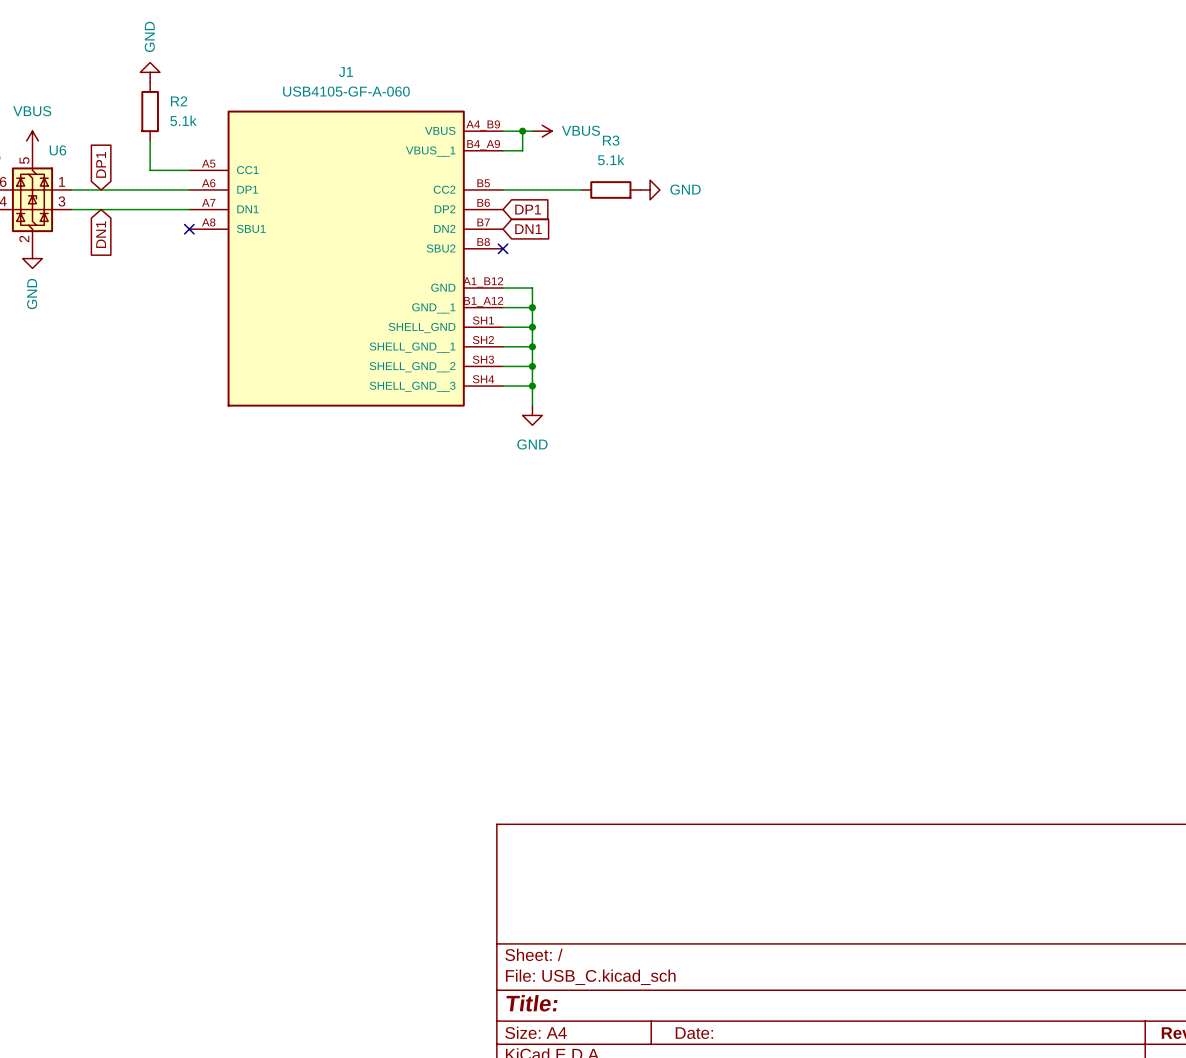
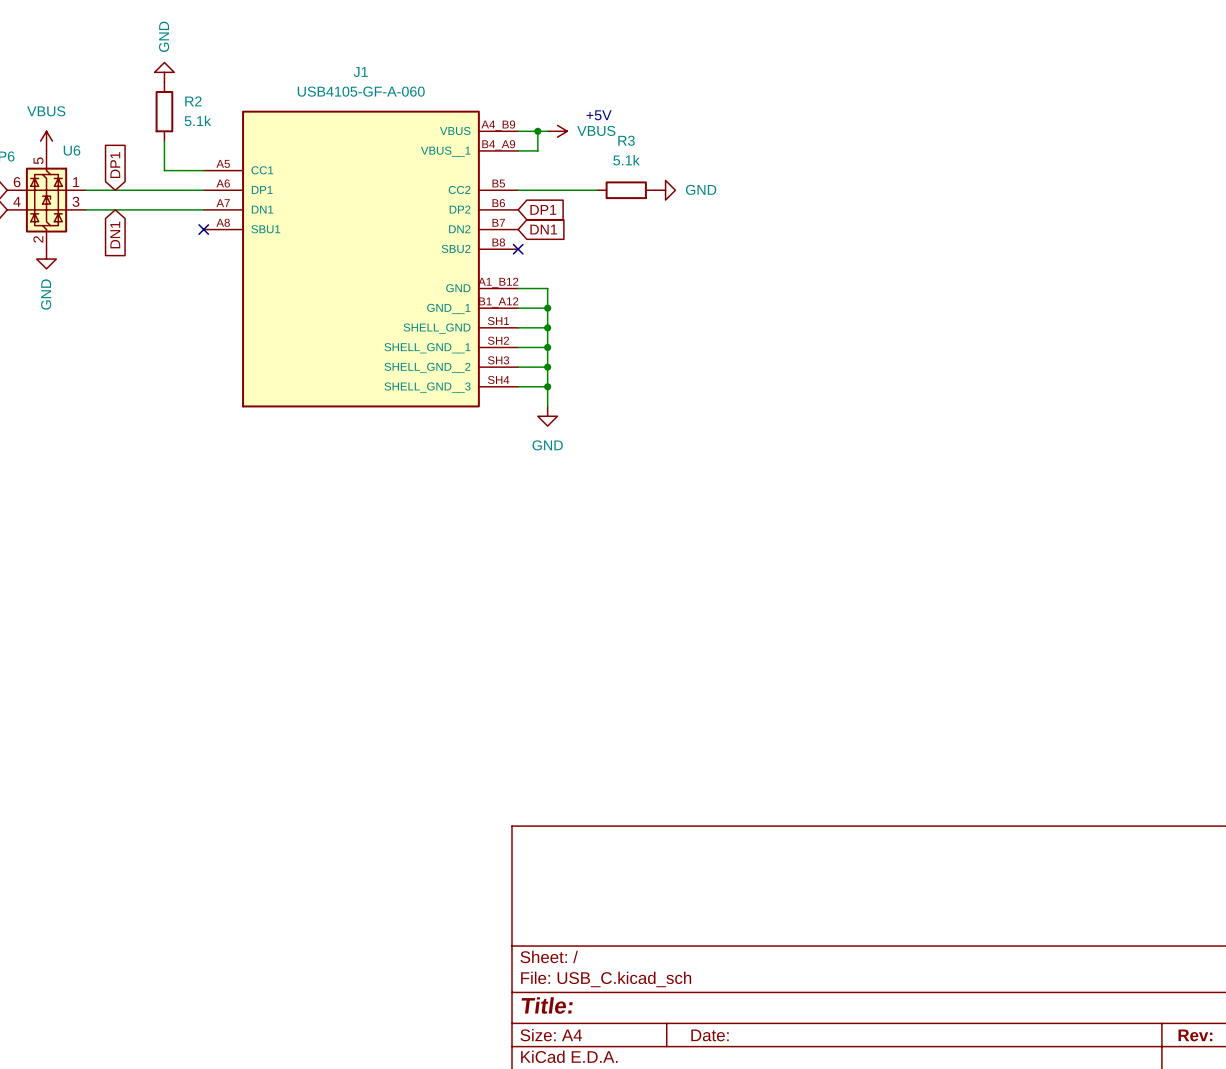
text: none -> +5V (599, 115)

